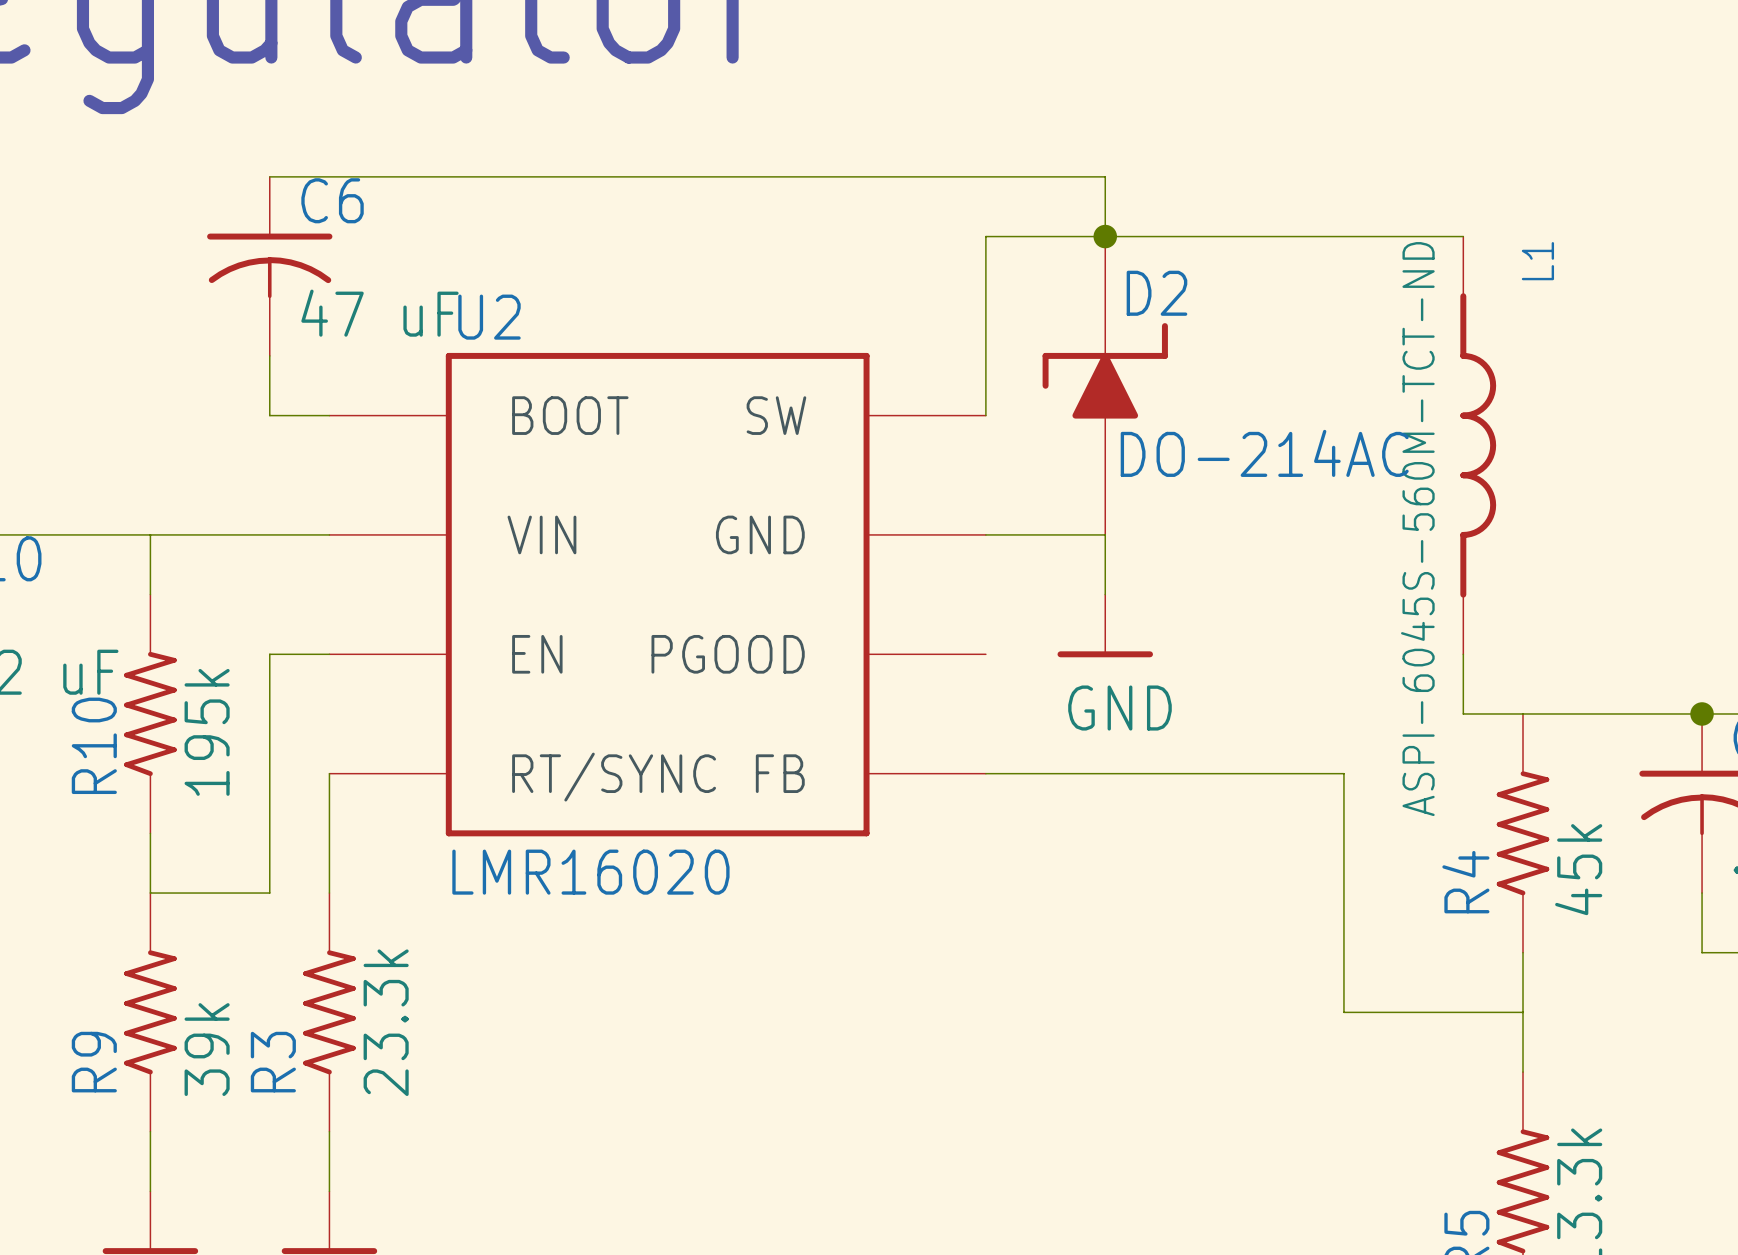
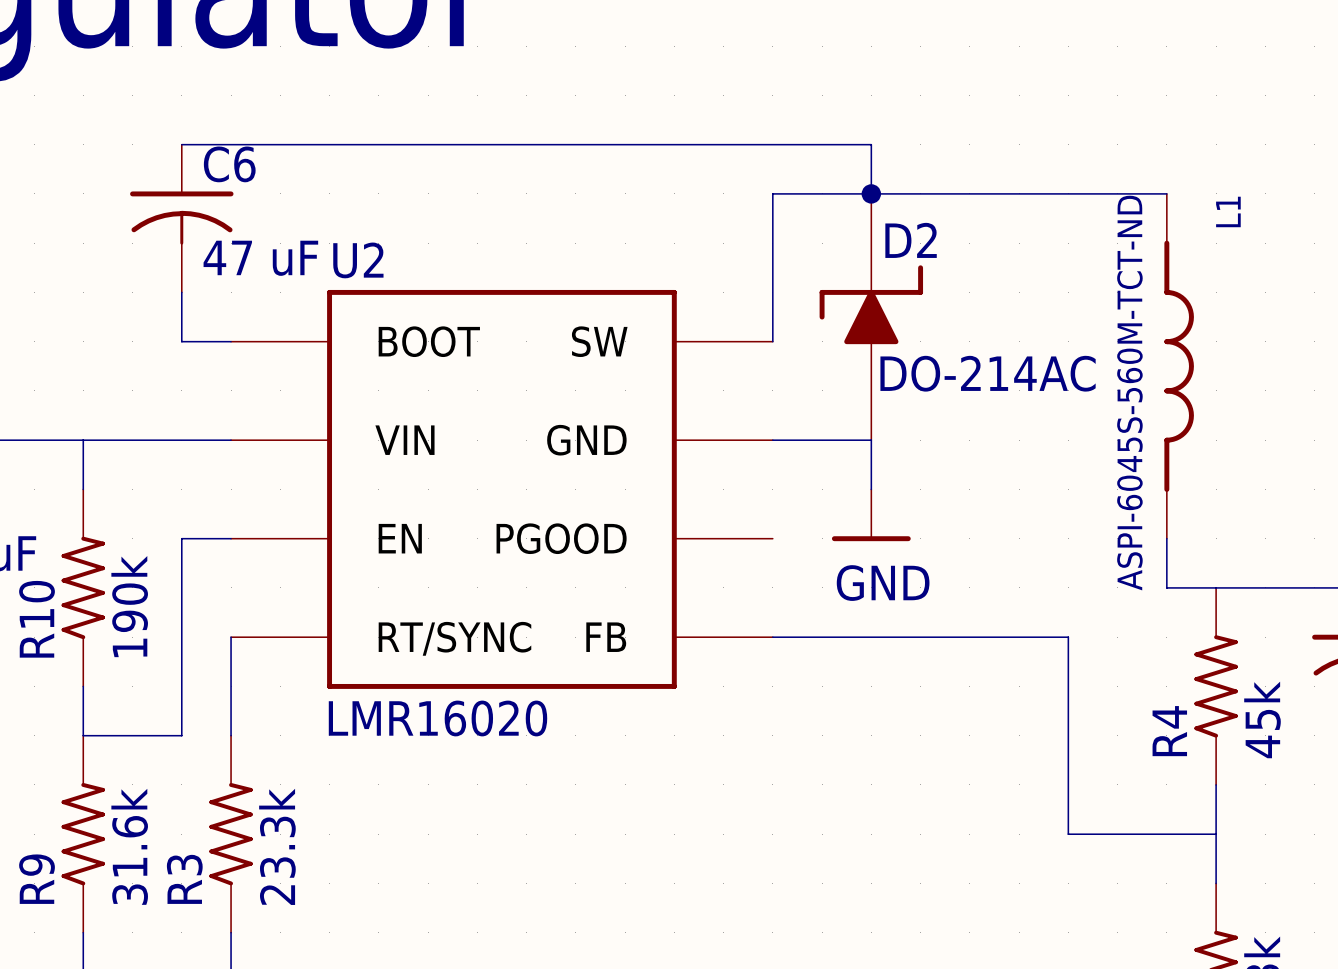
R10 value: 195k (207, 732) -> 190k (129, 606)
R9 value: 39k (207, 1049) -> 31.6k (129, 846)

